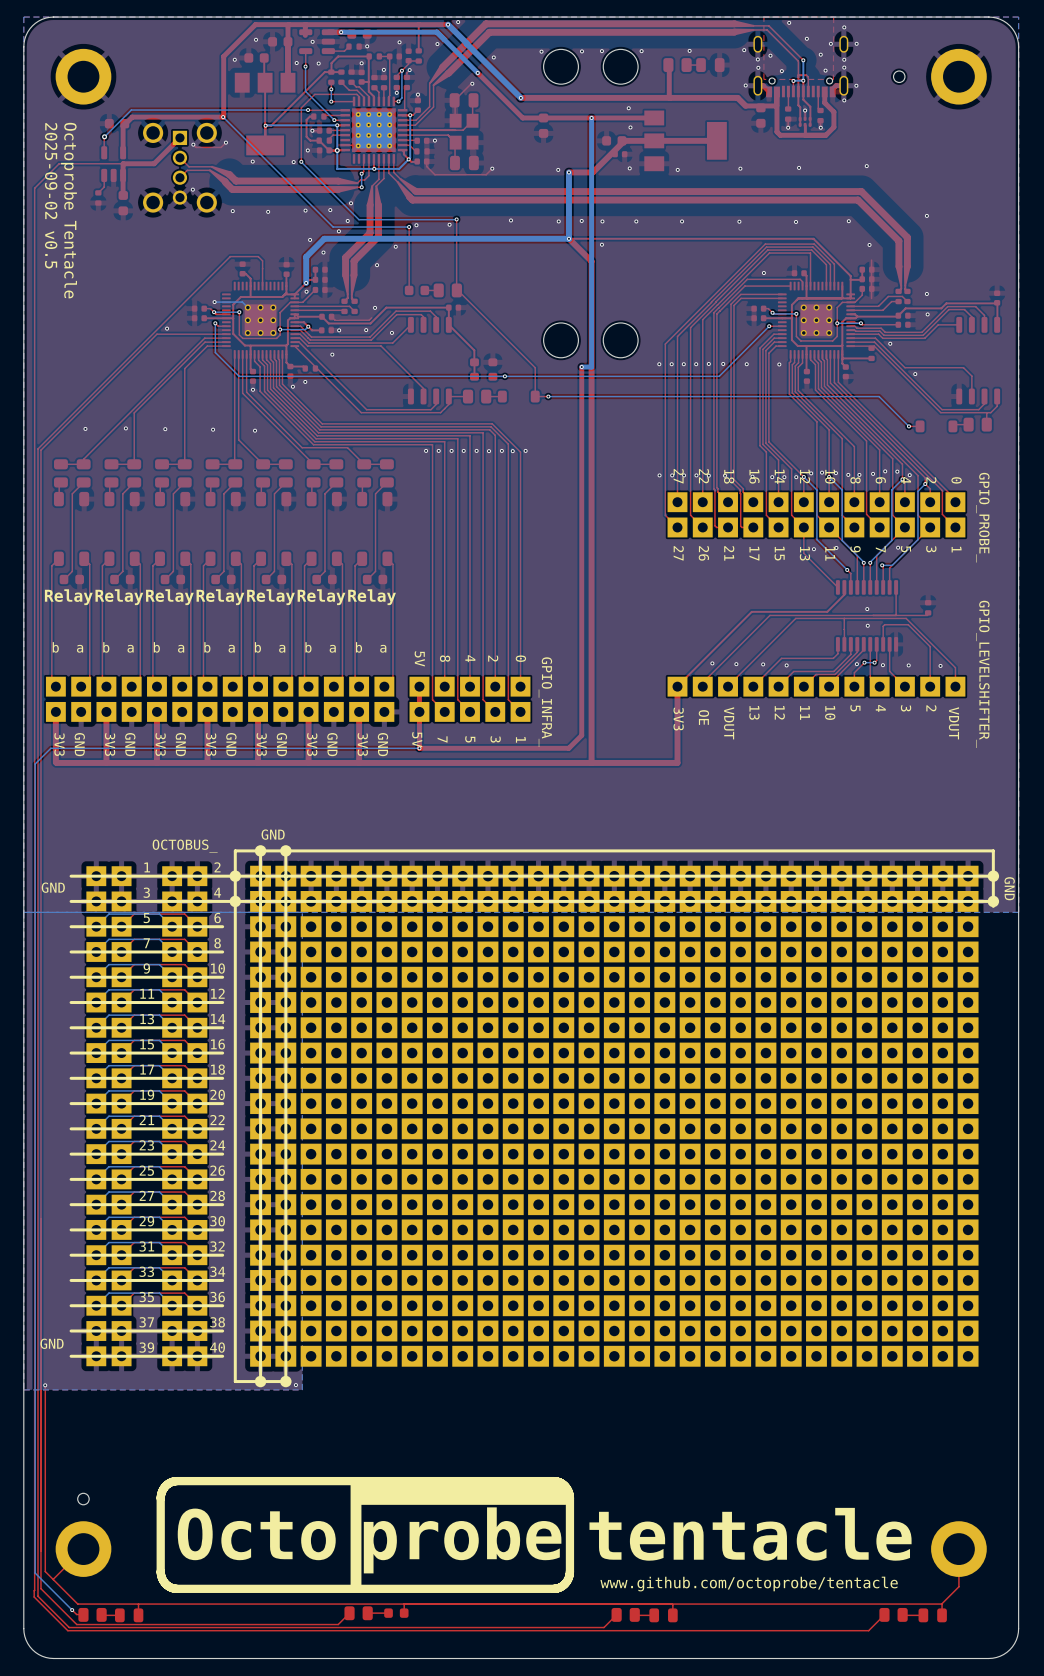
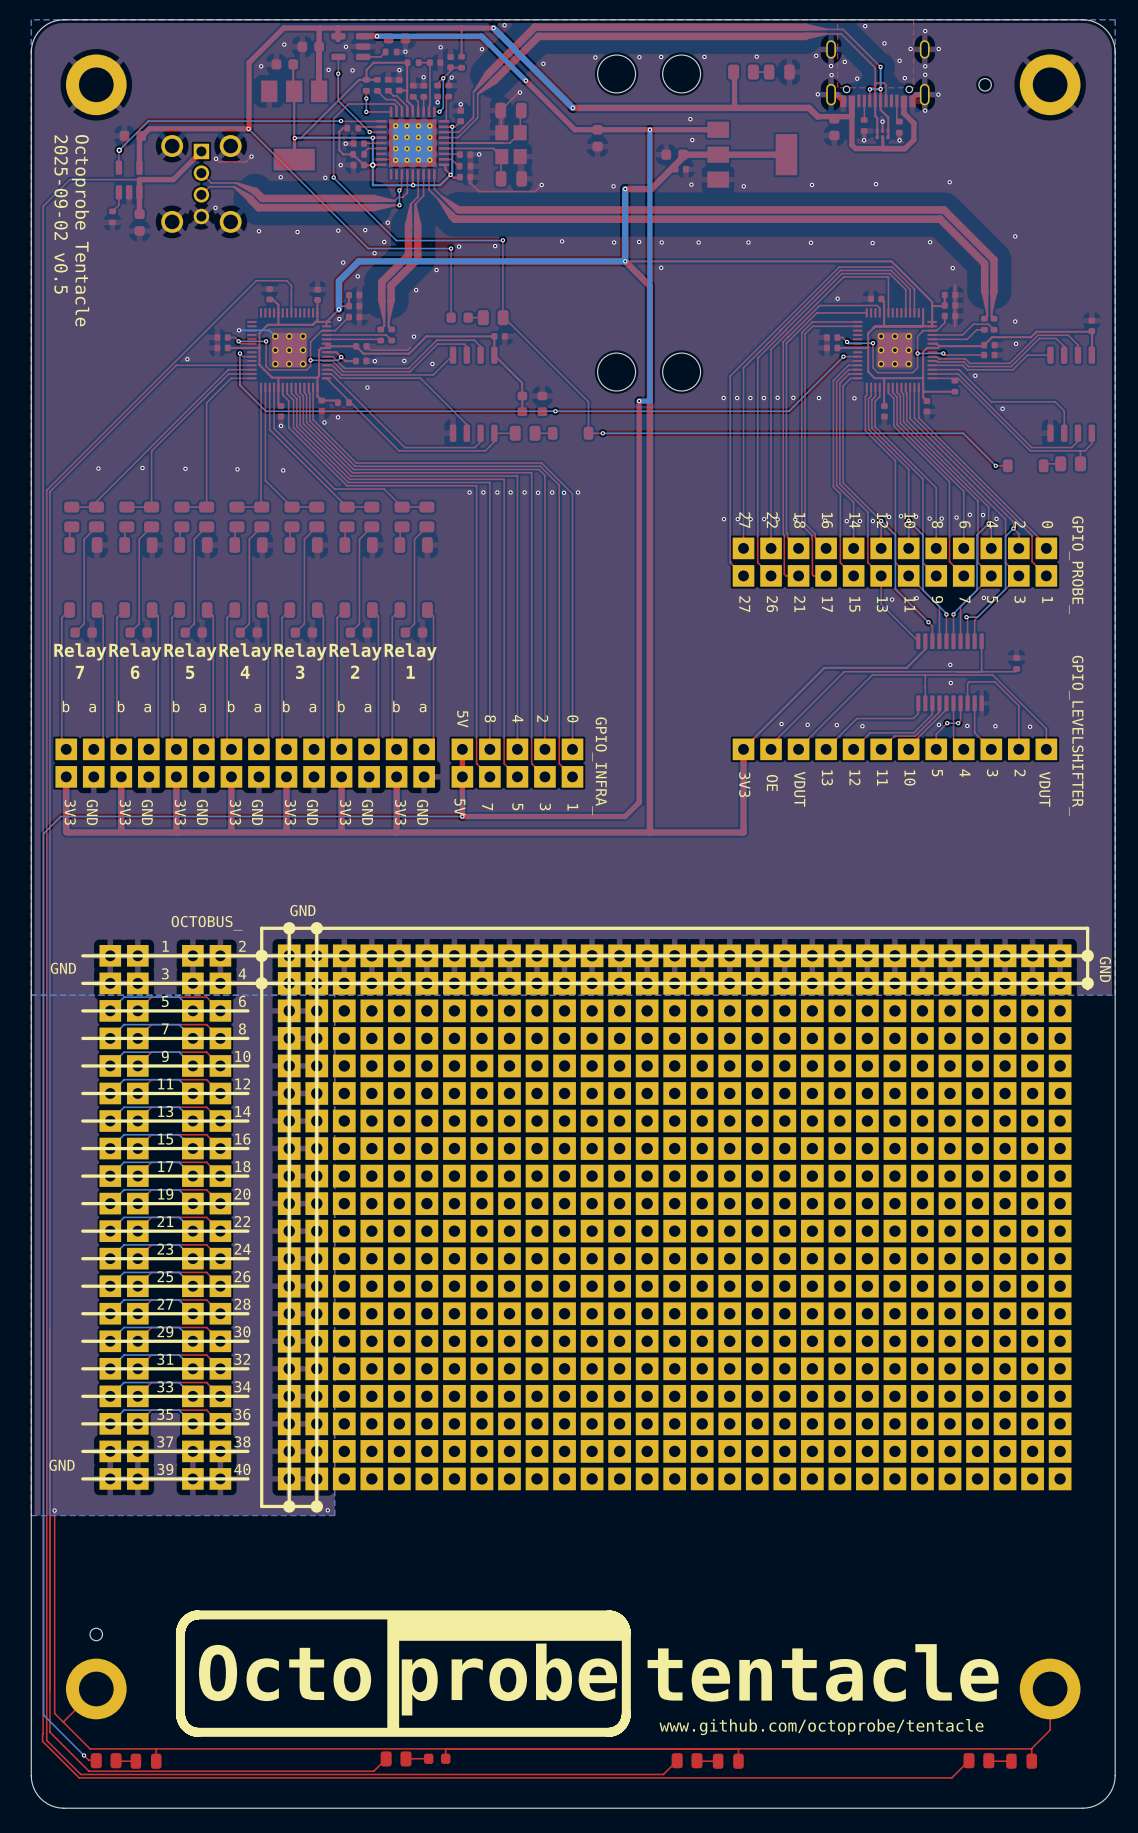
drawing shape: [44, 589, 93, 757] -> [54, 643, 107, 826]
drawing shape: [95, 589, 144, 757] -> [109, 643, 162, 826]
drawing shape: [146, 589, 194, 757] -> [164, 643, 217, 826]
drawing shape: [196, 589, 245, 757] -> [219, 643, 272, 826]
drawing shape: [247, 589, 295, 757] -> [274, 643, 327, 826]
drawing shape: [297, 589, 346, 757] -> [329, 643, 382, 826]
drawing shape: [348, 589, 396, 757] -> [384, 643, 437, 826]

